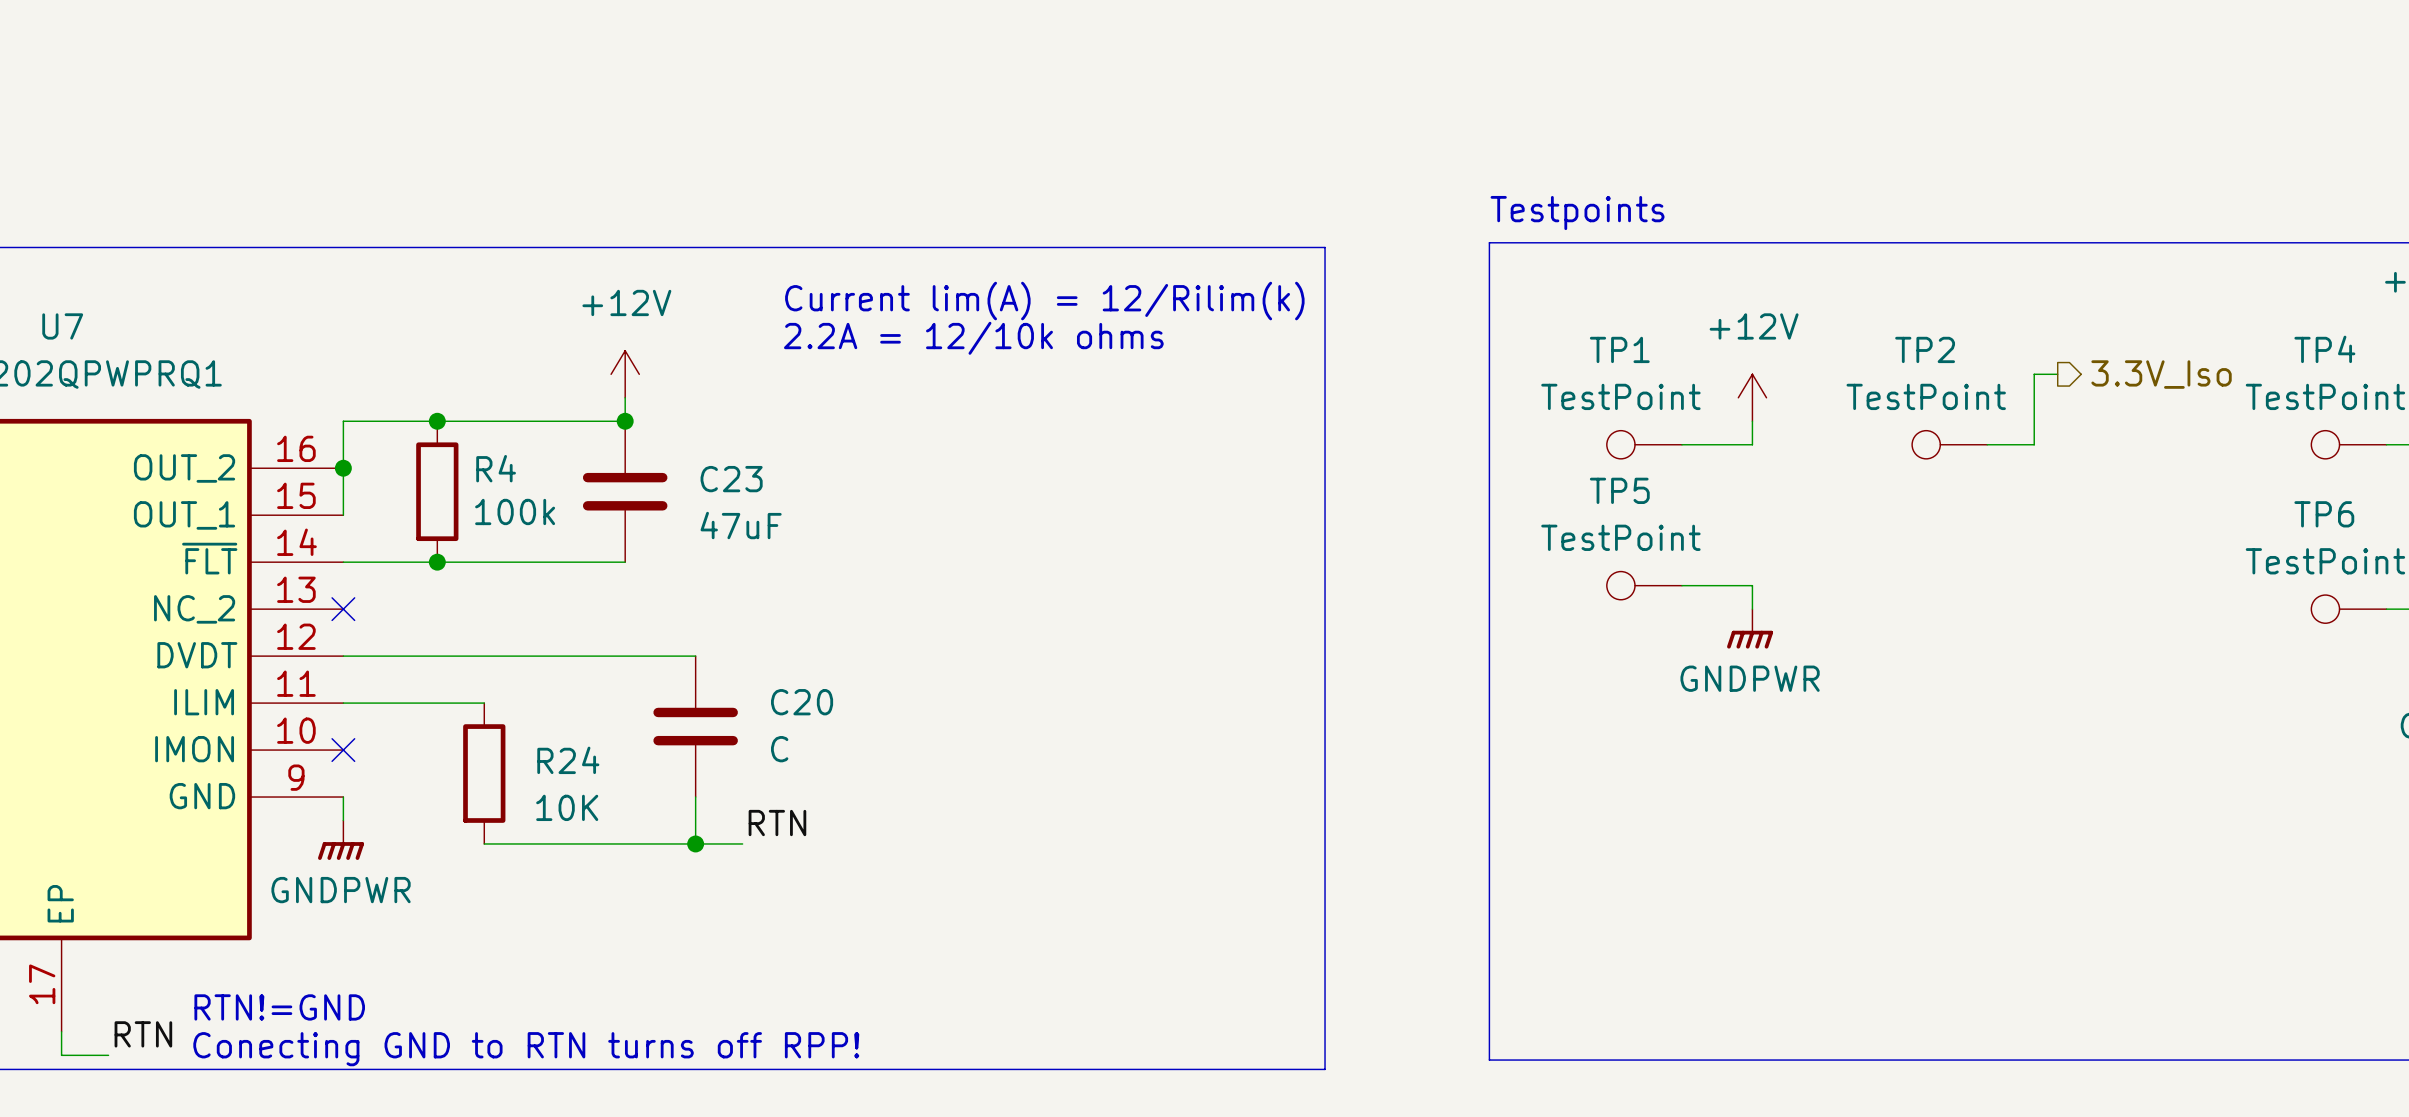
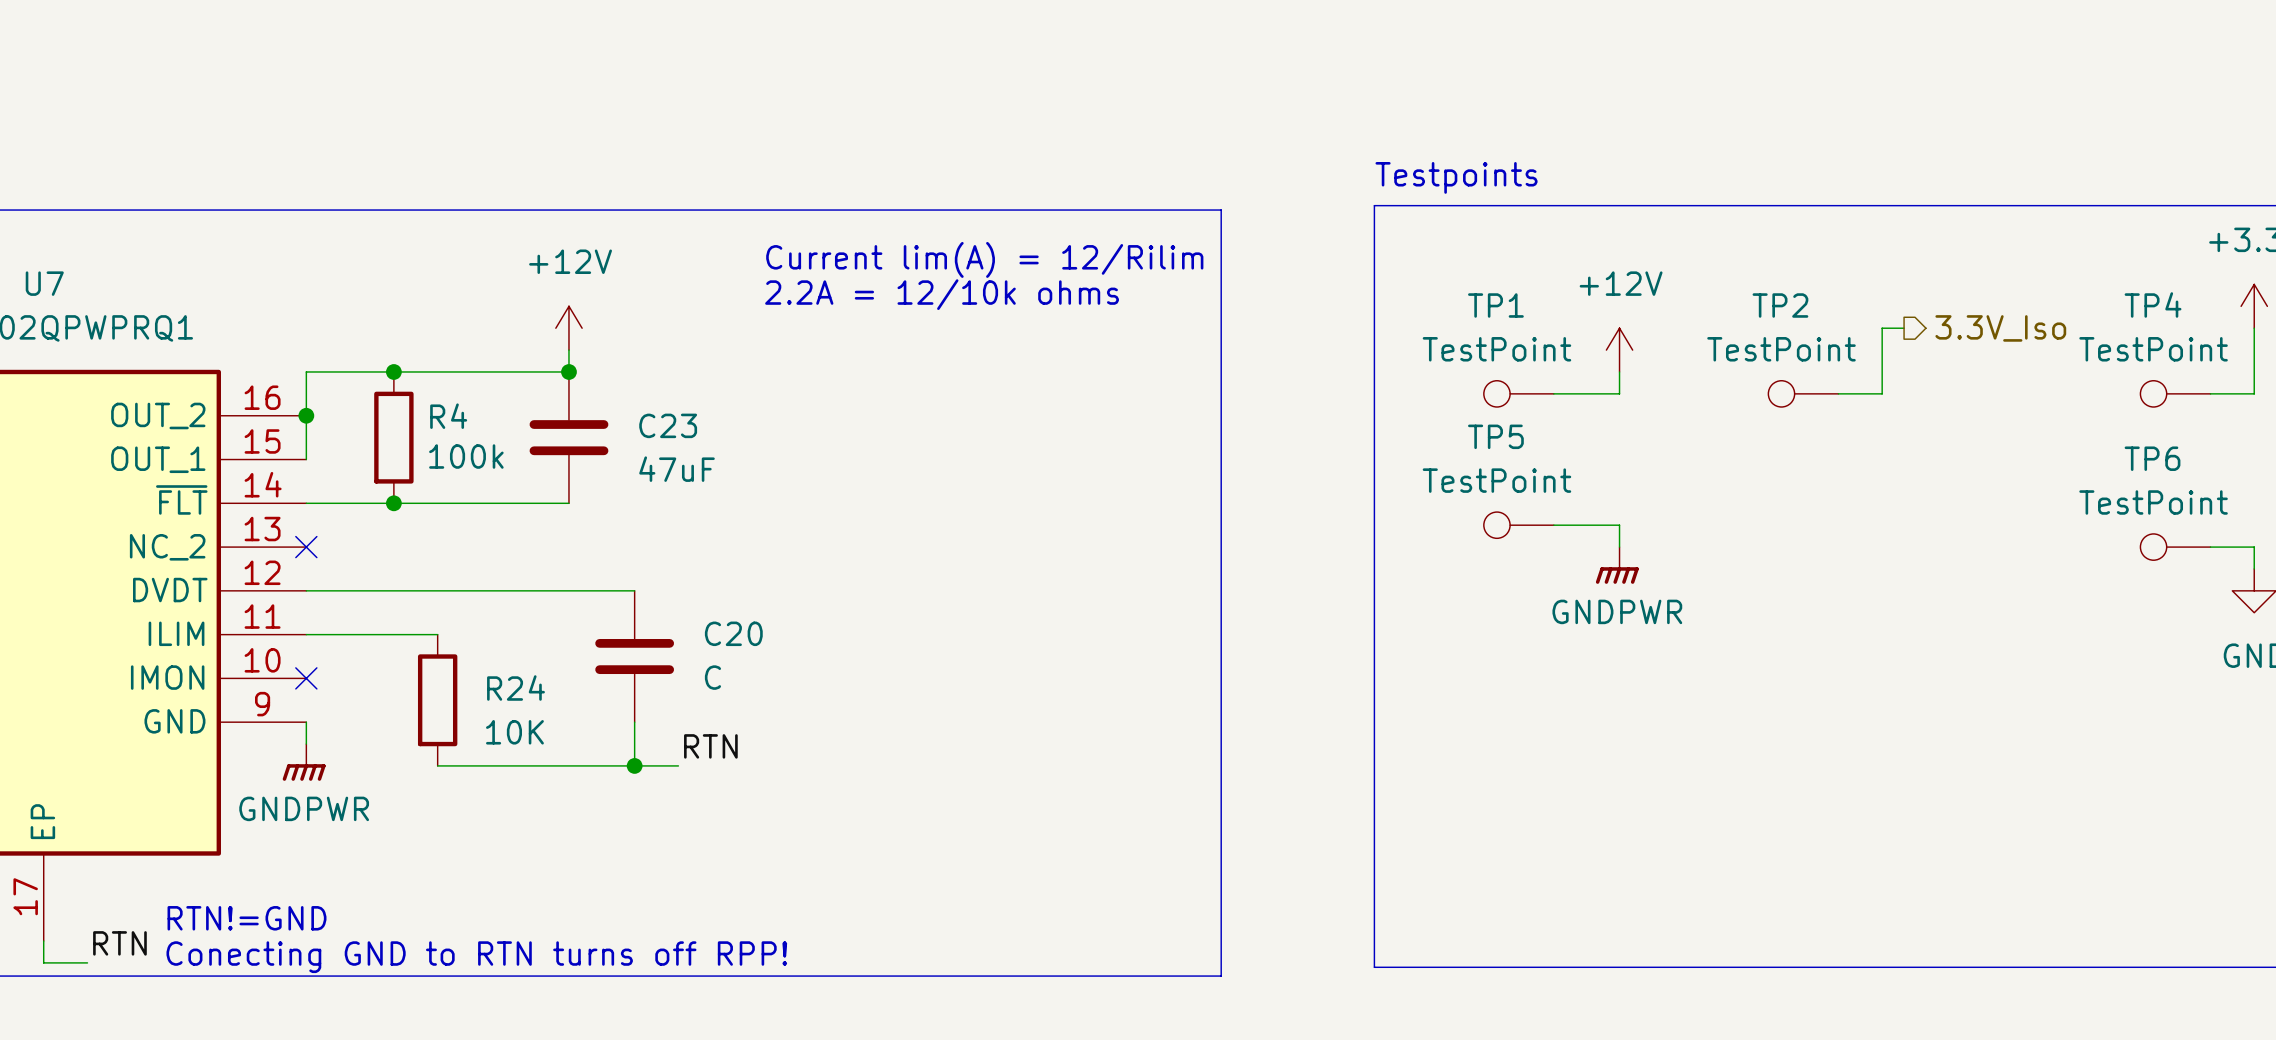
text: Current lim(A) = 12/Rilim(k) (1044, 301) -> Current lim(A) = 12/Rilim (984, 259)
text position: 2.2A = 12/10k ohms (973, 338) -> 2.2A = 12/10k ohms (942, 294)

